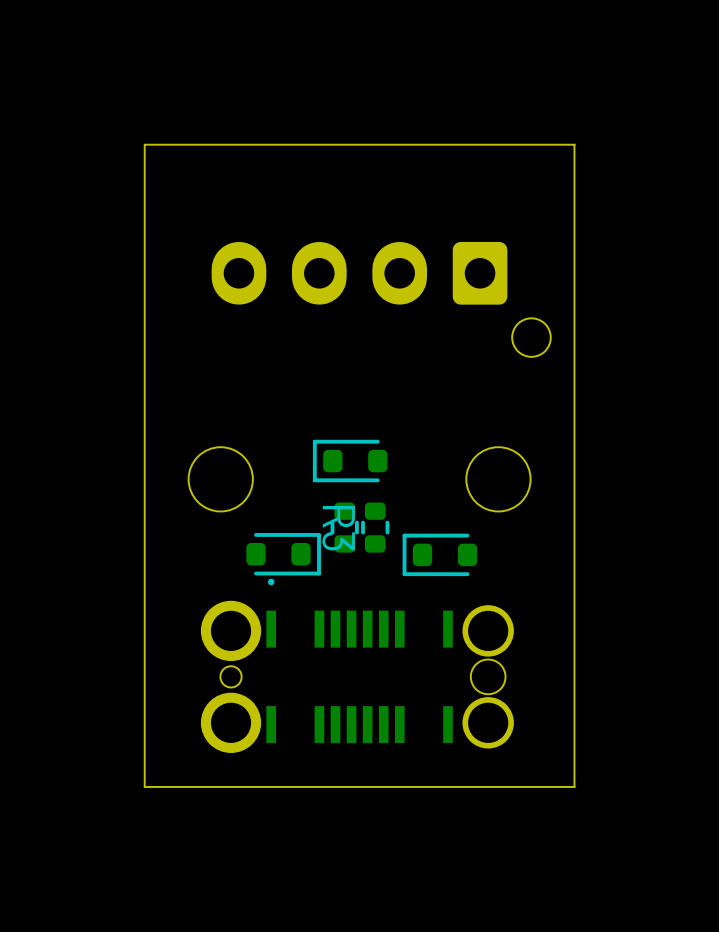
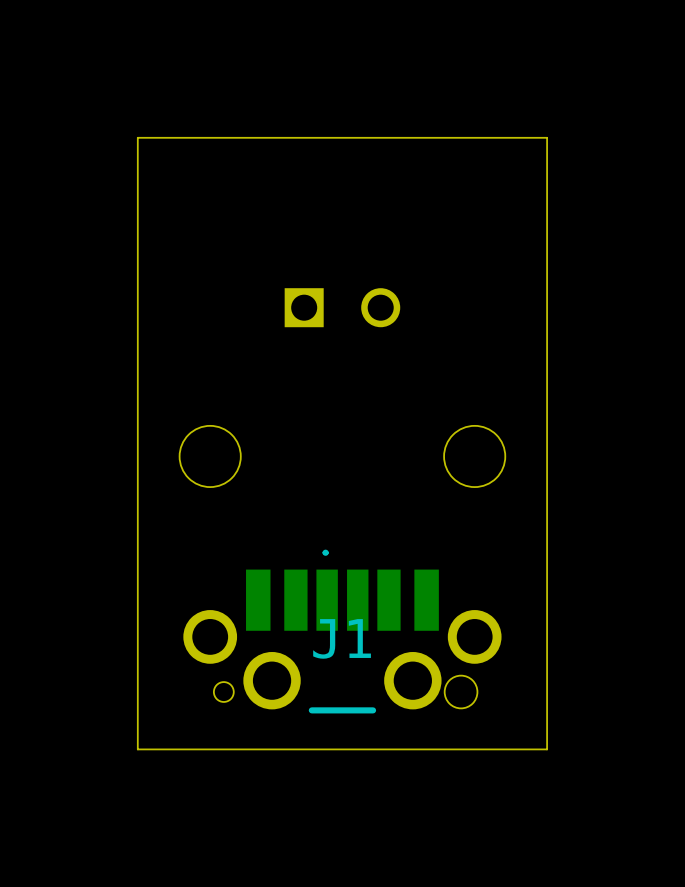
part footprint: [211, 241, 551, 357] -> [284, 288, 401, 328]
part: (350, 461) -> none
part: (344, 527) -> none
R3: (375, 527) -> none
part: (283, 554) -> none
part: (439, 554) -> none
J1: none -> (342, 631)
part: (357, 665) -> none

